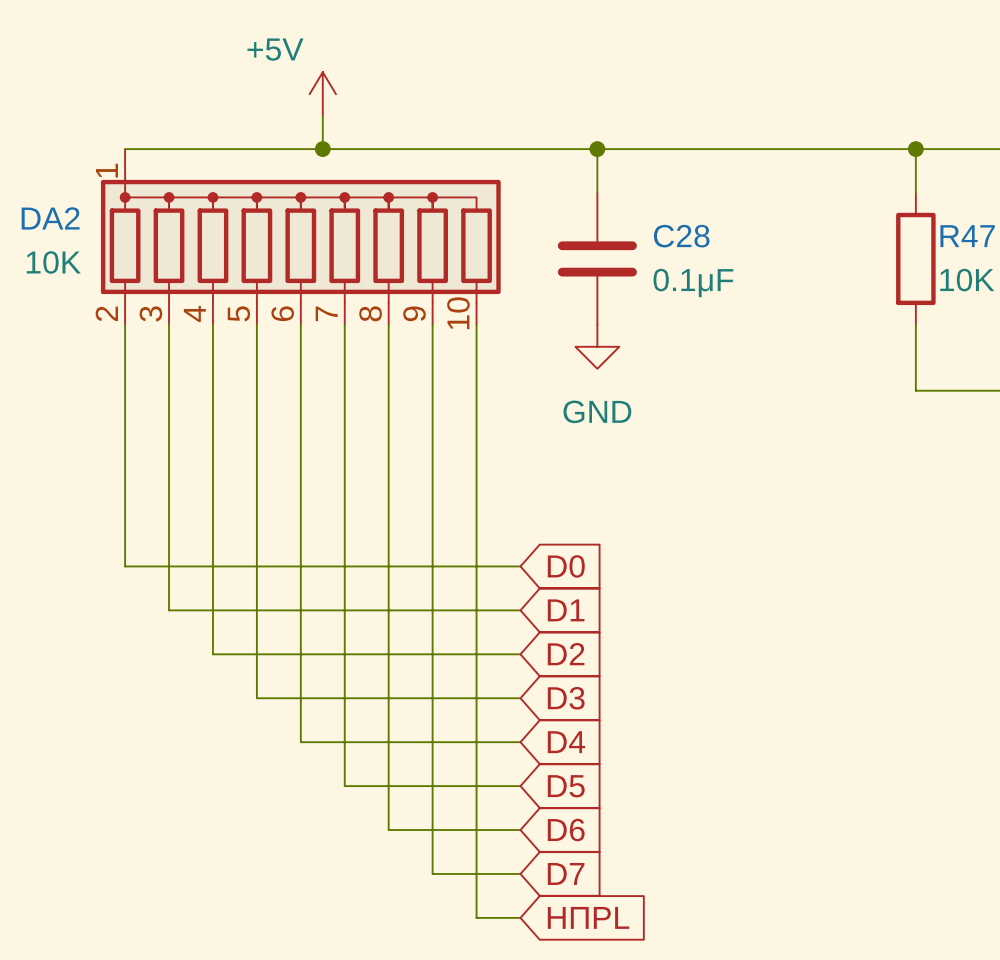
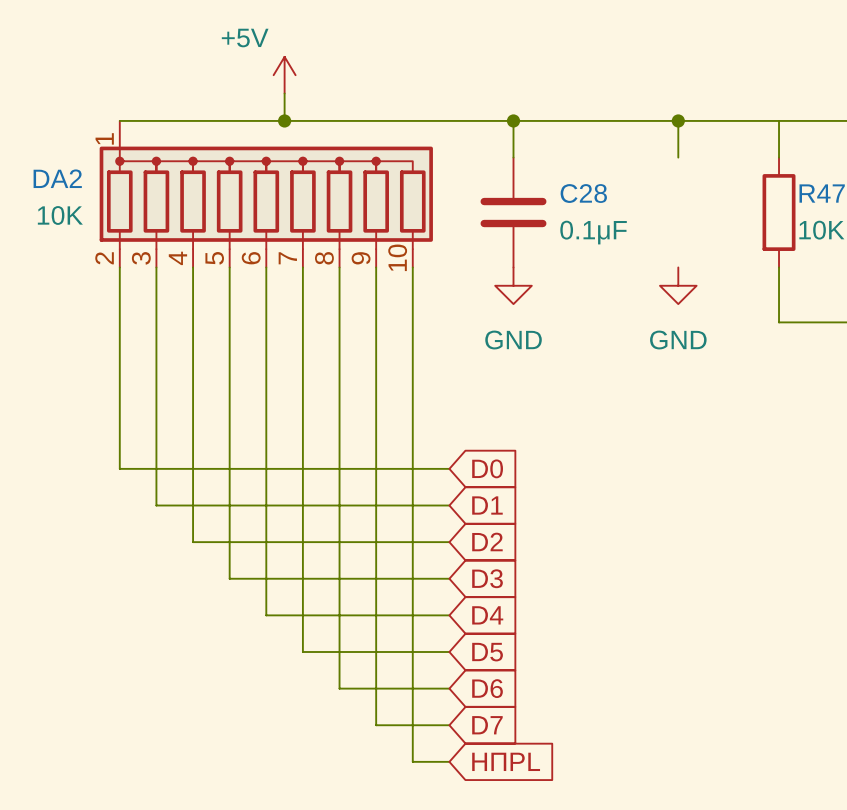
wire: none -> (678, 120) (678, 157)
junction: none -> (678, 120)
junction: (915, 149) -> none
power symbol: none -> GND (678, 285)

